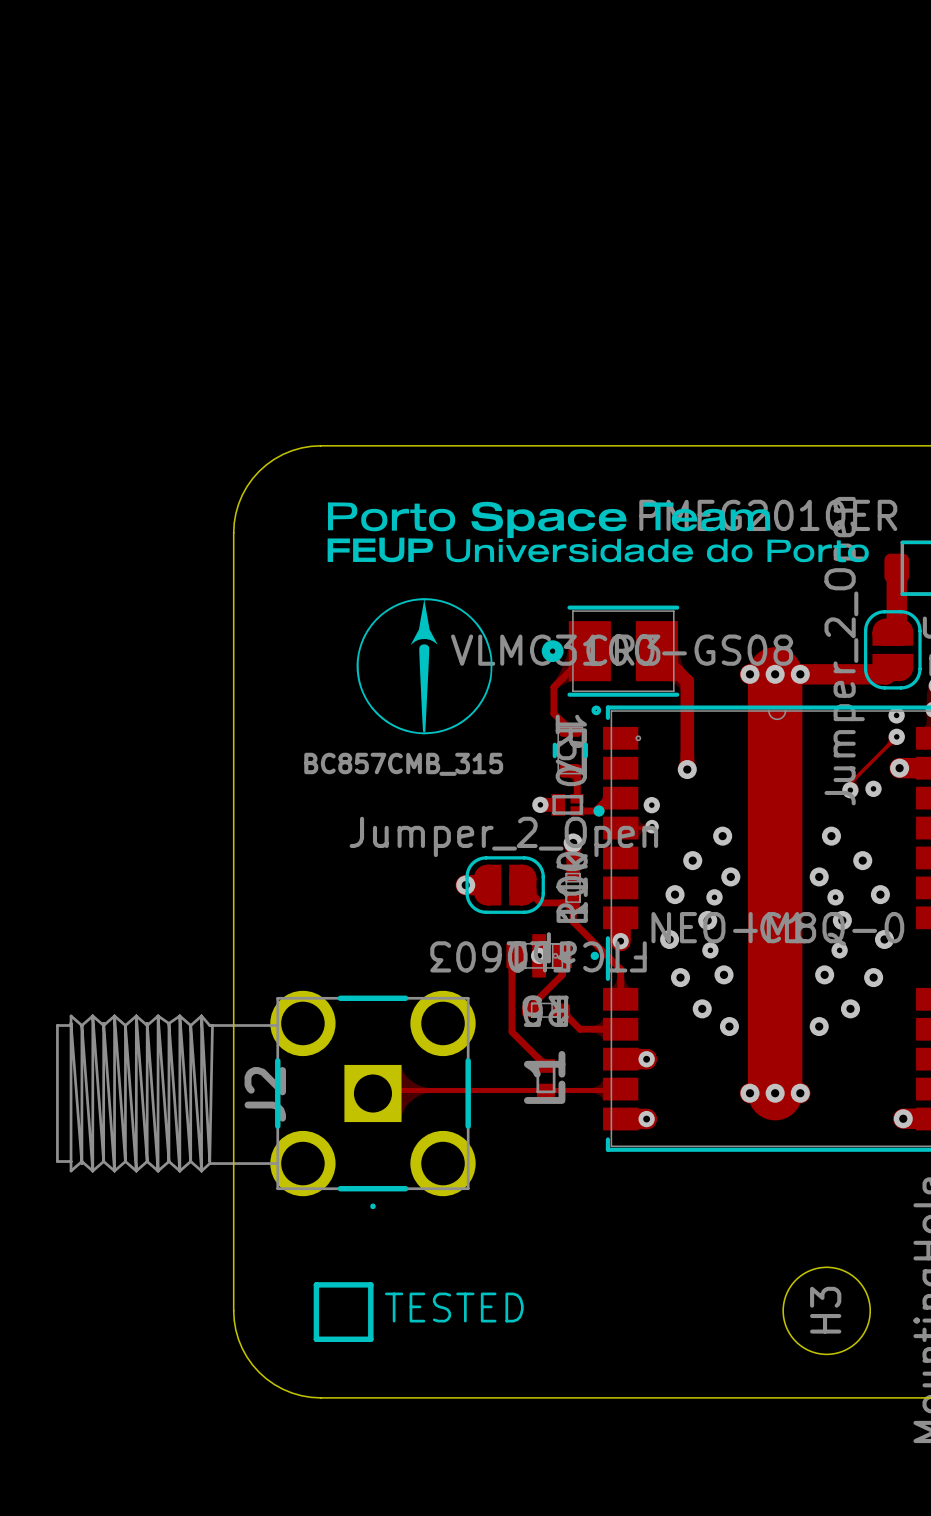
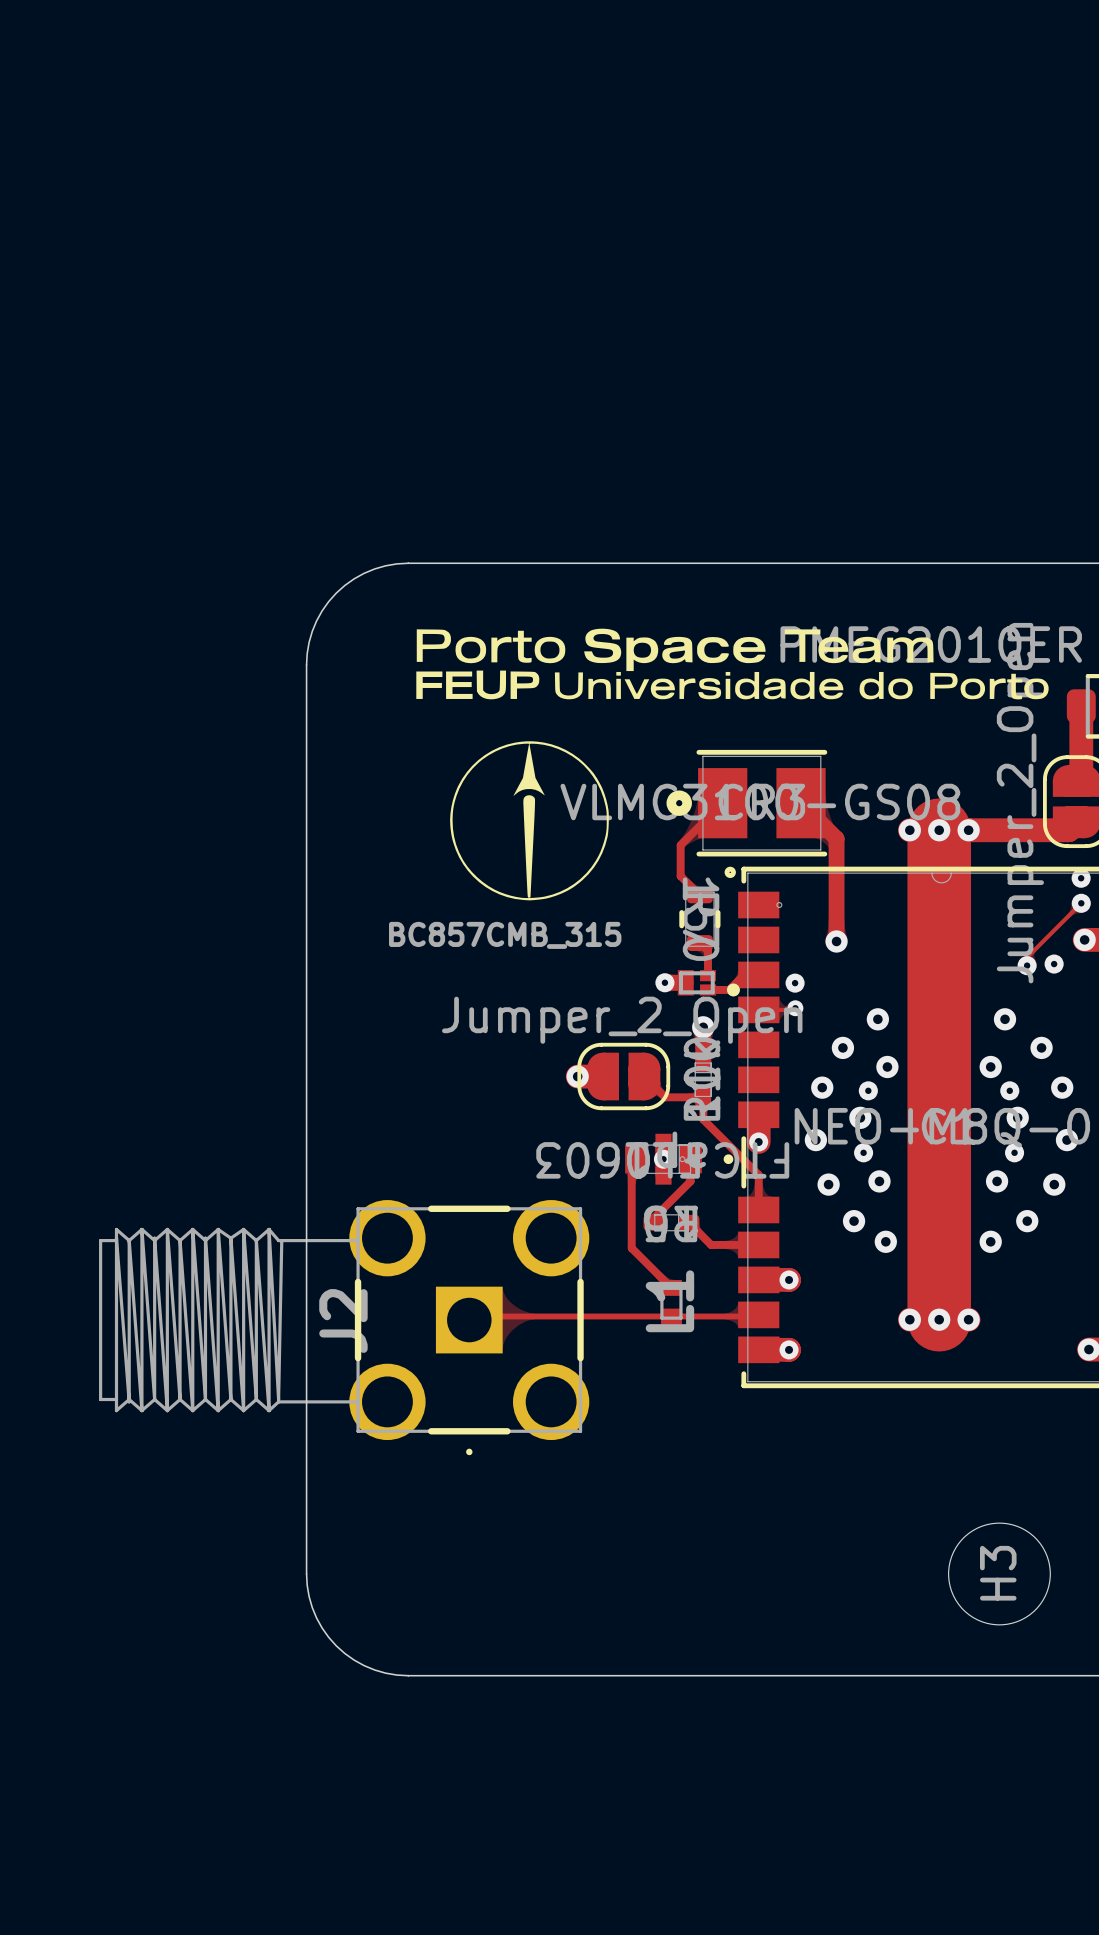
line: (316, 1284) (370, 1284) (370, 1339) (316, 1339) (316, 1284) -> none
text: TESTED (454, 1307) -> none

